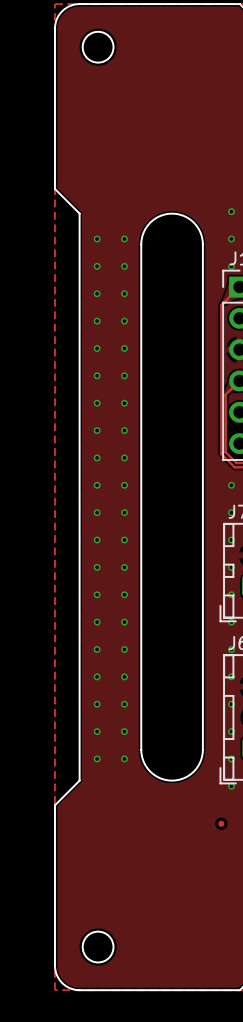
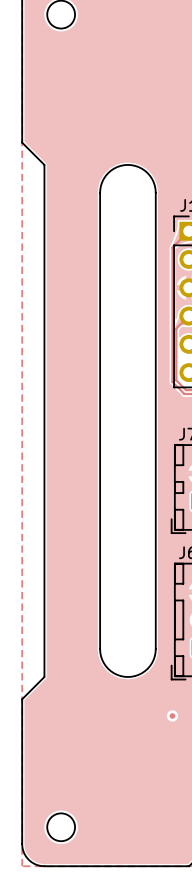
via: (231, 211) -> none
via: (97, 239) -> none
via: (124, 239) -> none
via: (231, 239) -> none
via: (97, 266) -> none
via: (124, 266) -> none
via: (231, 266) -> none
via: (97, 293) -> none
via: (124, 293) -> none
via: (97, 321) -> none
via: (124, 321) -> none
via: (97, 348) -> none
via: (124, 348) -> none
via: (97, 375) -> none
via: (124, 375) -> none
via: (97, 403) -> none
via: (124, 403) -> none
via: (97, 430) -> none
via: (124, 430) -> none
via: (97, 457) -> none
via: (124, 457) -> none
via: (97, 485) -> none
via: (124, 485) -> none
via: (231, 485) -> none
via: (97, 512) -> none
via: (124, 512) -> none
via: (231, 512) -> none
via: (97, 540) -> none
via: (124, 540) -> none
via: (231, 540) -> none
via: (97, 567) -> none
via: (124, 567) -> none
via: (231, 567) -> none
via: (97, 594) -> none
via: (124, 594) -> none
via: (231, 594) -> none
via: (97, 622) -> none
via: (124, 622) -> none
via: (231, 622) -> none
via: (97, 649) -> none
via: (124, 649) -> none
via: (231, 649) -> none
via: (97, 676) -> none
via: (124, 676) -> none
via: (231, 676) -> none
via: (97, 704) -> none
via: (124, 704) -> none
via: (231, 704) -> none
via: (97, 731) -> none
via: (124, 731) -> none
via: (231, 731) -> none
via: (97, 758) -> none
via: (124, 758) -> none
via: (231, 758) -> none
via: (231, 786) -> none

